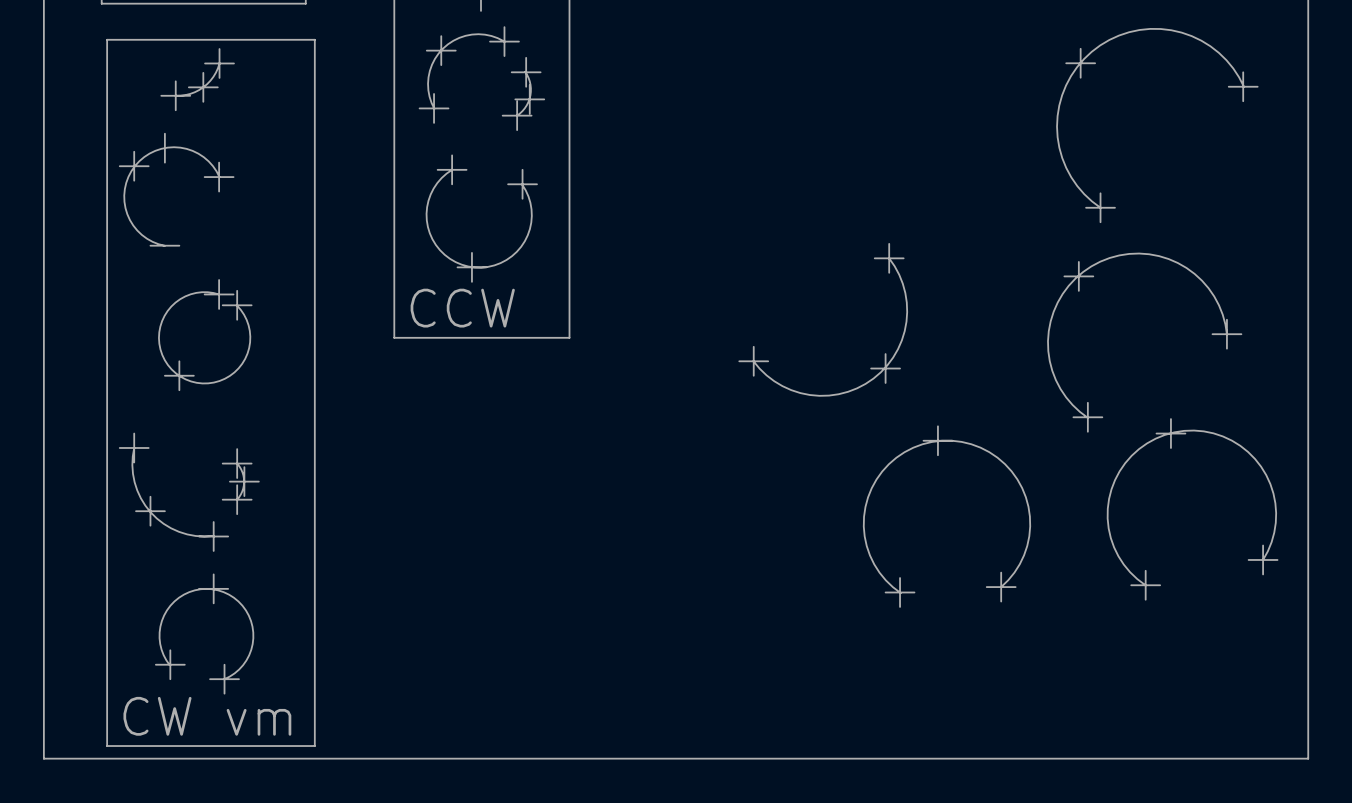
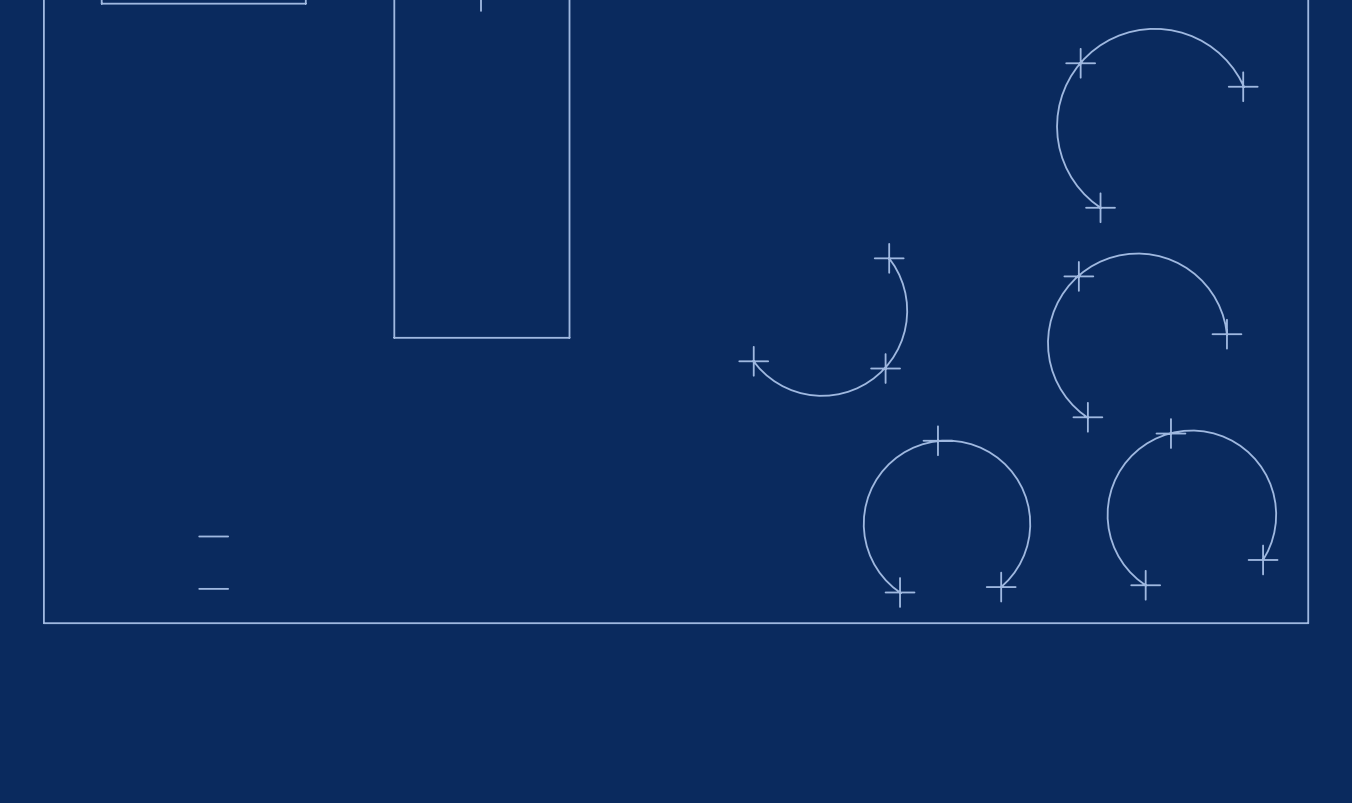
line: (504, 27) (504, 56) -> none
line: (441, 36) (441, 65) -> none
line: (107, 39) (314, 39) (314, 746) (107, 746) (107, 39) -> none
line: (490, 41) (518, 41) -> none
line: (503, 41) (491, 35) (471, 34) (459, 37) (443, 48) (432, 64) (428, 77) (428, 90) (434, 108) -> none
line: (219, 49) (219, 77) -> none
line: (426, 50) (455, 50) -> none
line: (526, 57) (526, 86) -> none
line: (205, 63) (233, 63) -> none
line: (219, 63) (213, 76) (203, 87) (190, 93) (175, 95) -> none
line: (525, 71) (530, 84) (530, 95) (524, 108) (517, 115) -> none
line: (203, 72) (203, 101) -> none
line: (511, 72) (540, 72) -> none
line: (175, 81) (175, 110) -> none
line: (529, 84) (529, 113) -> none
line: (188, 87) (217, 87) -> none
line: (434, 93) (434, 122) -> none
line: (161, 95) (190, 95) -> none
line: (515, 99) (544, 99) -> none
line: (517, 101) (517, 130) -> none
line: (419, 108) (448, 108) -> none
line: (502, 115) (531, 115) -> none
line: (164, 133) (164, 162) -> none
line: (134, 151) (134, 180) -> none
line: (452, 155) (452, 184) -> none
line: (219, 162) (219, 191) -> none
line: (119, 166) (148, 166) -> none
line: (437, 169) (466, 169) -> none
line: (452, 169) (441, 178) (433, 188) (427, 207) (426, 220) (432, 239) (440, 250) (450, 258) (468, 266) (481, 267) (494, 265) (511, 256) (521, 246) (527, 235) (531, 215) (530, 202) (522, 184) -> none
line: (522, 169) (522, 198) -> none
line: (204, 177) (233, 177) -> none
line: (219, 177) (212, 166) (203, 157) (192, 150) (180, 147) (167, 147) (155, 150) (144, 157) (135, 165) (128, 176) (124, 189) (124, 201) (127, 214) (133, 225) (141, 234) (152, 241) (164, 245) -> none
line: (508, 184) (536, 184) -> none
line: (150, 245) (179, 245) -> none
line: (471, 252) (471, 281) -> none
line: (457, 267) (486, 267) -> none
line: (219, 280) (219, 308) -> none
line: (237, 290) (237, 319) -> none
line: (204, 294) (233, 294) -> none
line: (219, 294) (202, 292) (185, 296) (171, 306) (162, 321) (158, 338) (162, 354) (167, 365) (180, 376) (196, 382) (213, 382) (229, 375) (238, 368) (247, 353) (250, 336) (246, 319) (236, 305) -> none
line: (222, 305) (251, 305) -> none
text: CCW (462, 308) -> none
line: (179, 361) (179, 390) -> none
line: (164, 375) (193, 375) -> none
line: (134, 433) (134, 462) -> none
line: (119, 447) (148, 447) -> none
line: (134, 447) (132, 465) (134, 482) (140, 498) (150, 512) (163, 523) (178, 531) (195, 535) (212, 536) -> none
line: (237, 449) (237, 478) -> none
line: (222, 463) (251, 463) -> none
line: (237, 464) (242, 472) (244, 481) (242, 491) (237, 499) -> none
line: (244, 467) (244, 496) -> none
line: (229, 481) (258, 481) -> none
line: (237, 485) (237, 514) -> none
line: (150, 496) (150, 525) -> none
line: (222, 499) (251, 499) -> none
line: (136, 511) (164, 511) -> none
line: (213, 522) (213, 550) -> none
line: (213, 574) (213, 603) -> none
line: (43, 623) (43, 758) (1308, 758) (1308, 623) -> (43, 623) (1308, 623)
line: (170, 650) (170, 679) -> none
line: (155, 664) (184, 664) -> none
line: (224, 664) (224, 693) -> none
line: (169, 665) (161, 649) (159, 638) (161, 620) (167, 610) (179, 597) (189, 592) (206, 588) (218, 590) (228, 594) (242, 605) (248, 615) (253, 632) (251, 649) (246, 660) (239, 669) (224, 679) -> none
line: (210, 679) (238, 679) -> none
text: CW vm (207, 716) -> none

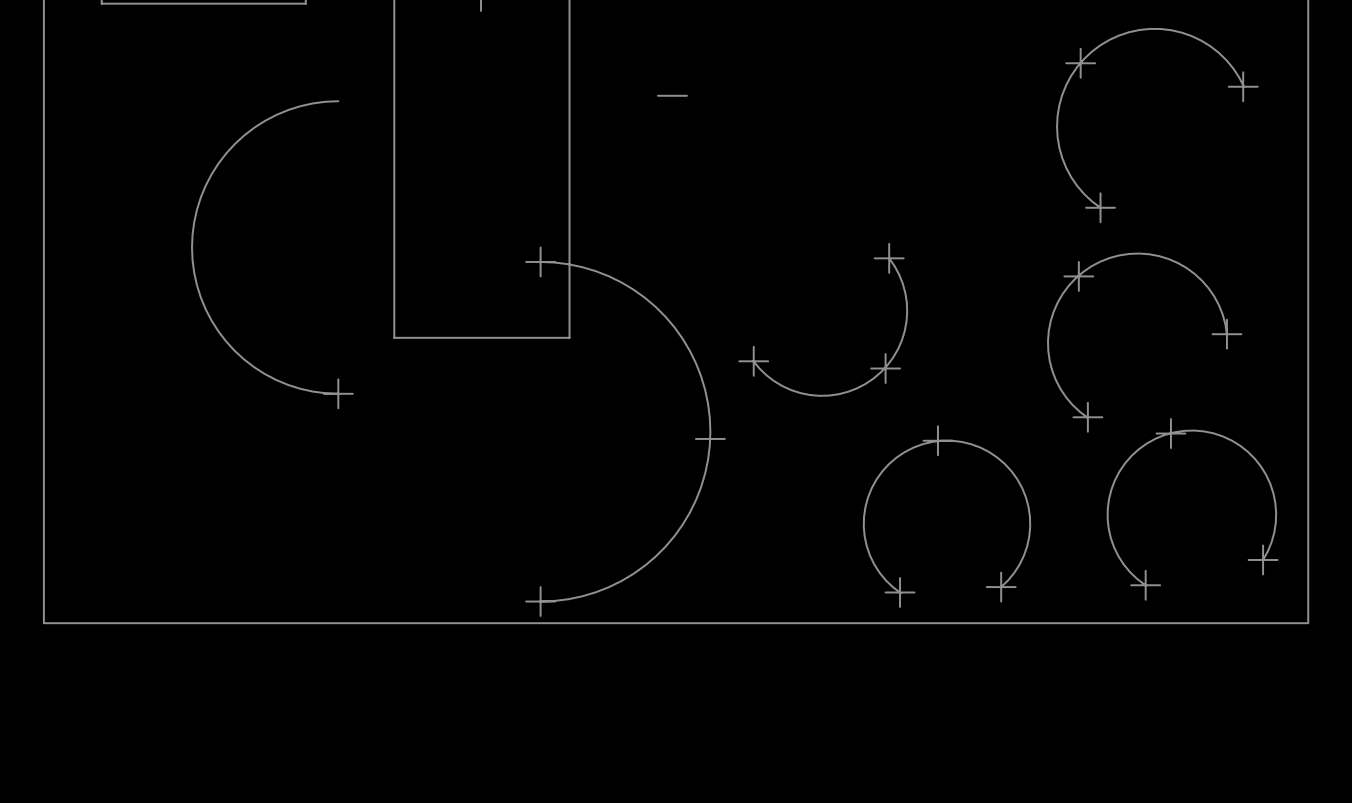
line: none -> (658, 95) (686, 95)
line: none -> (338, 101) (312, 103) (288, 110) (265, 120) (234, 144) (218, 163) (205, 185) (196, 209) (192, 247) (196, 285) (205, 309) (218, 331) (234, 350) (254, 367) (276, 380) (300, 388) (338, 393)
line: none -> (540, 247) (540, 276)
line: none -> (526, 261) (555, 261)
line: none -> (540, 261) (568, 264) (608, 276) (633, 289) (655, 306) (674, 327) (696, 363) (705, 390) (710, 431) (708, 459) (701, 486) (689, 512) (665, 546) (644, 565) (608, 587) (582, 596) (540, 601)
line: none -> (338, 379) (338, 408)
line: none -> (695, 438) (724, 438)
line: (199, 536) (228, 536) -> (323, 393) (352, 393)
line: none -> (540, 587) (540, 615)
line: (199, 588) (228, 588) -> (526, 601) (555, 601)

